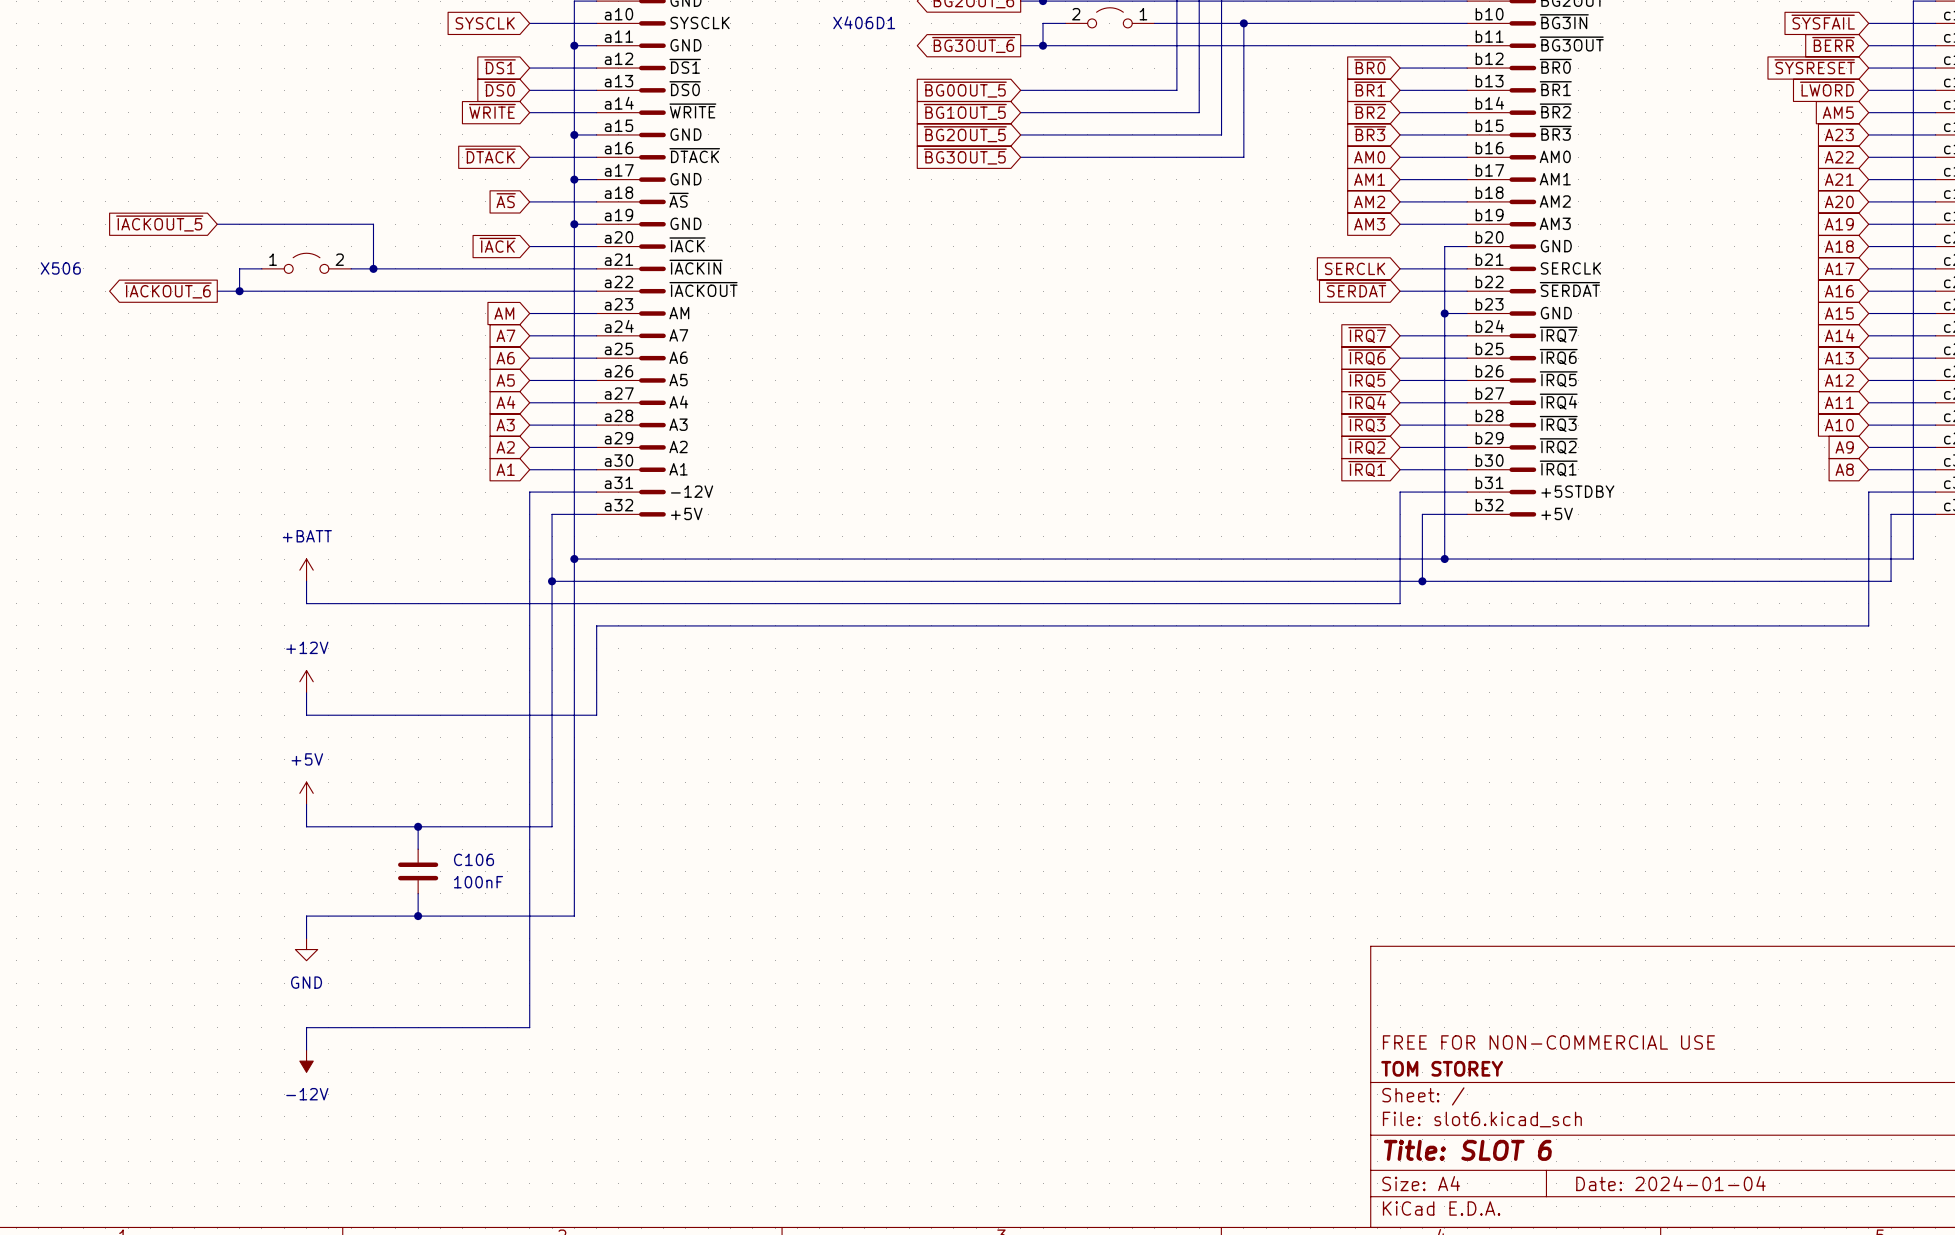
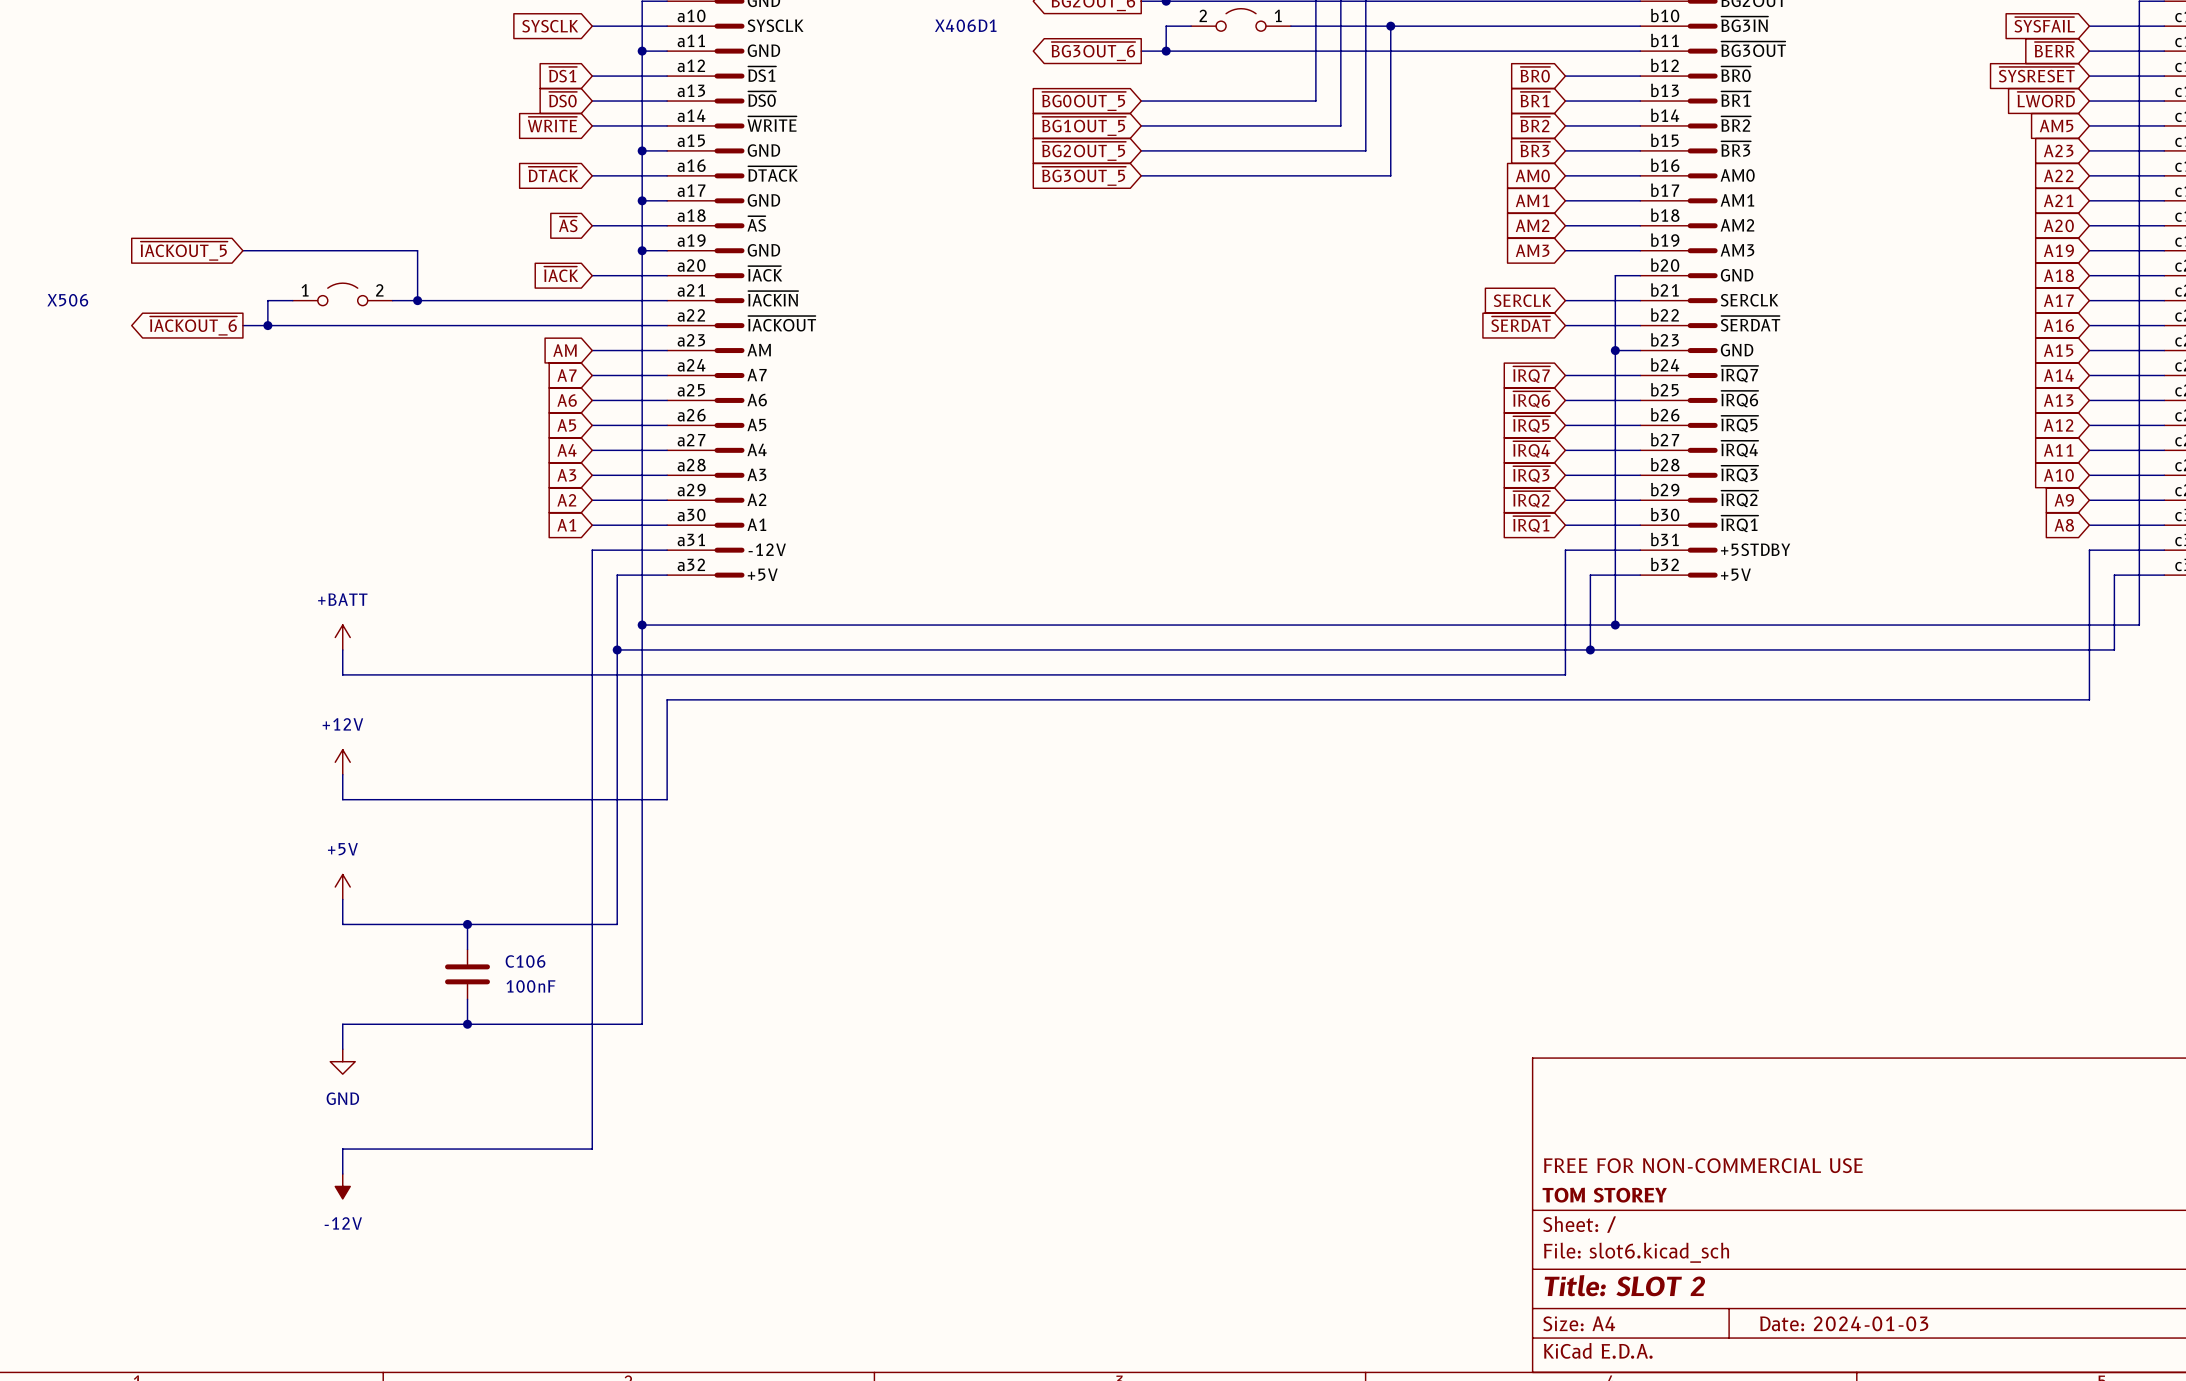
title block: Title: SLOT 6 (1467, 1150) -> Title: SLOT 2 (1624, 1285)
title block: Date: 2024-01-04 (1670, 1183) -> Date: 2024-01-03 (1844, 1323)

